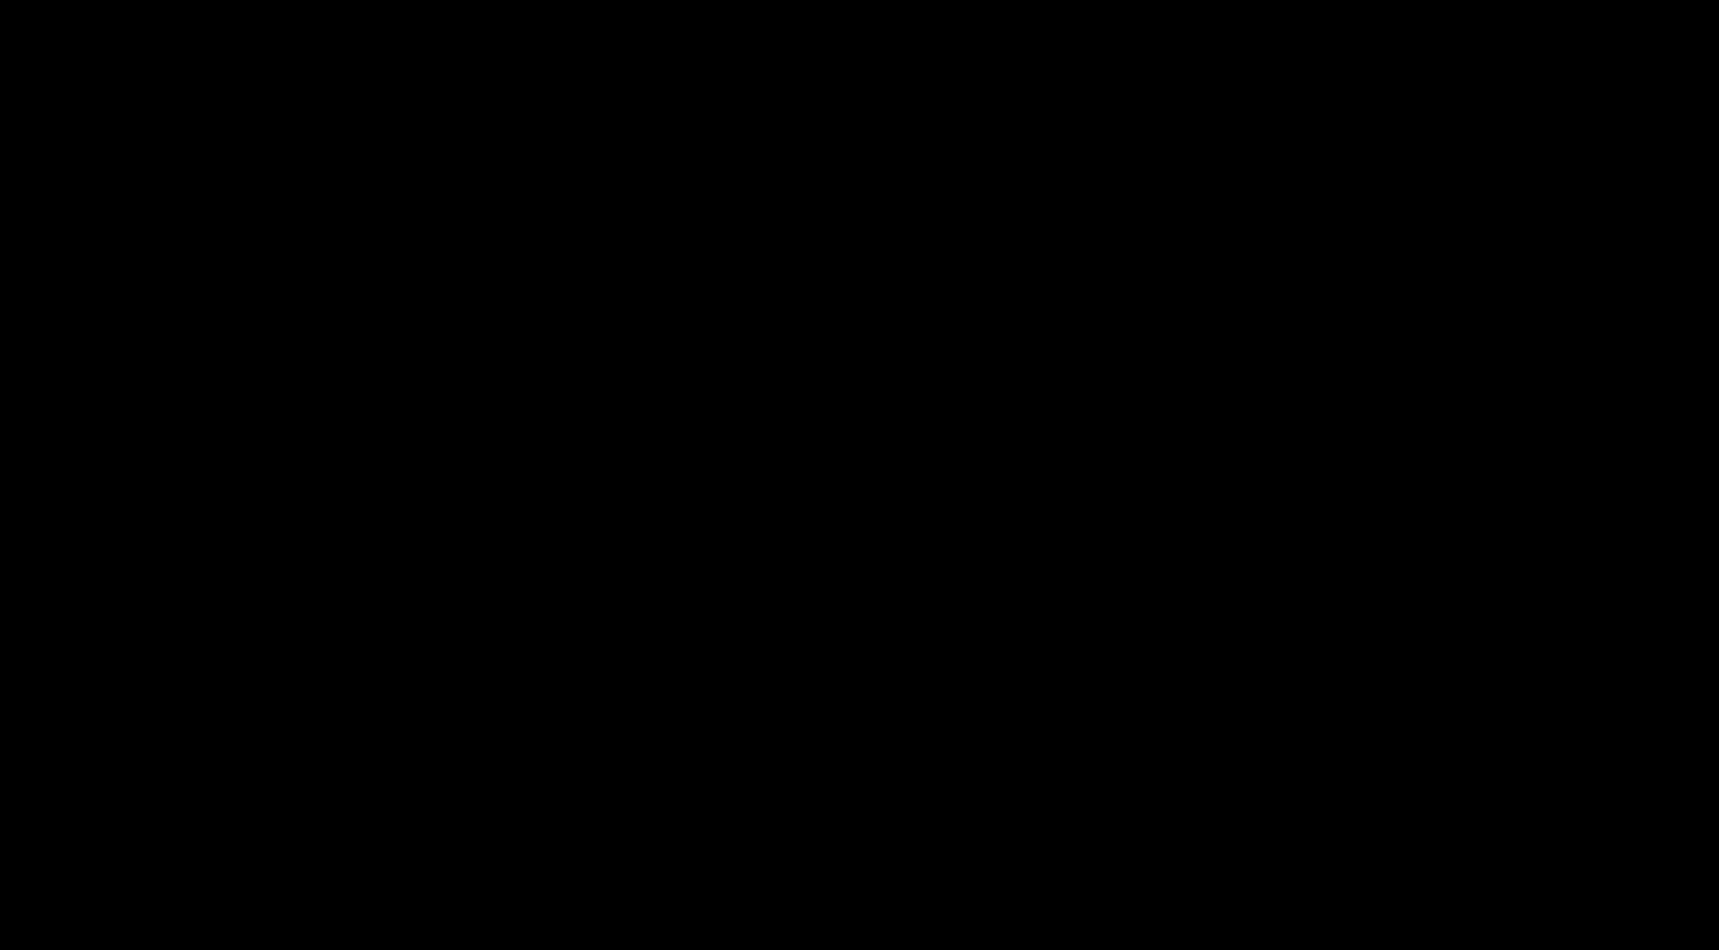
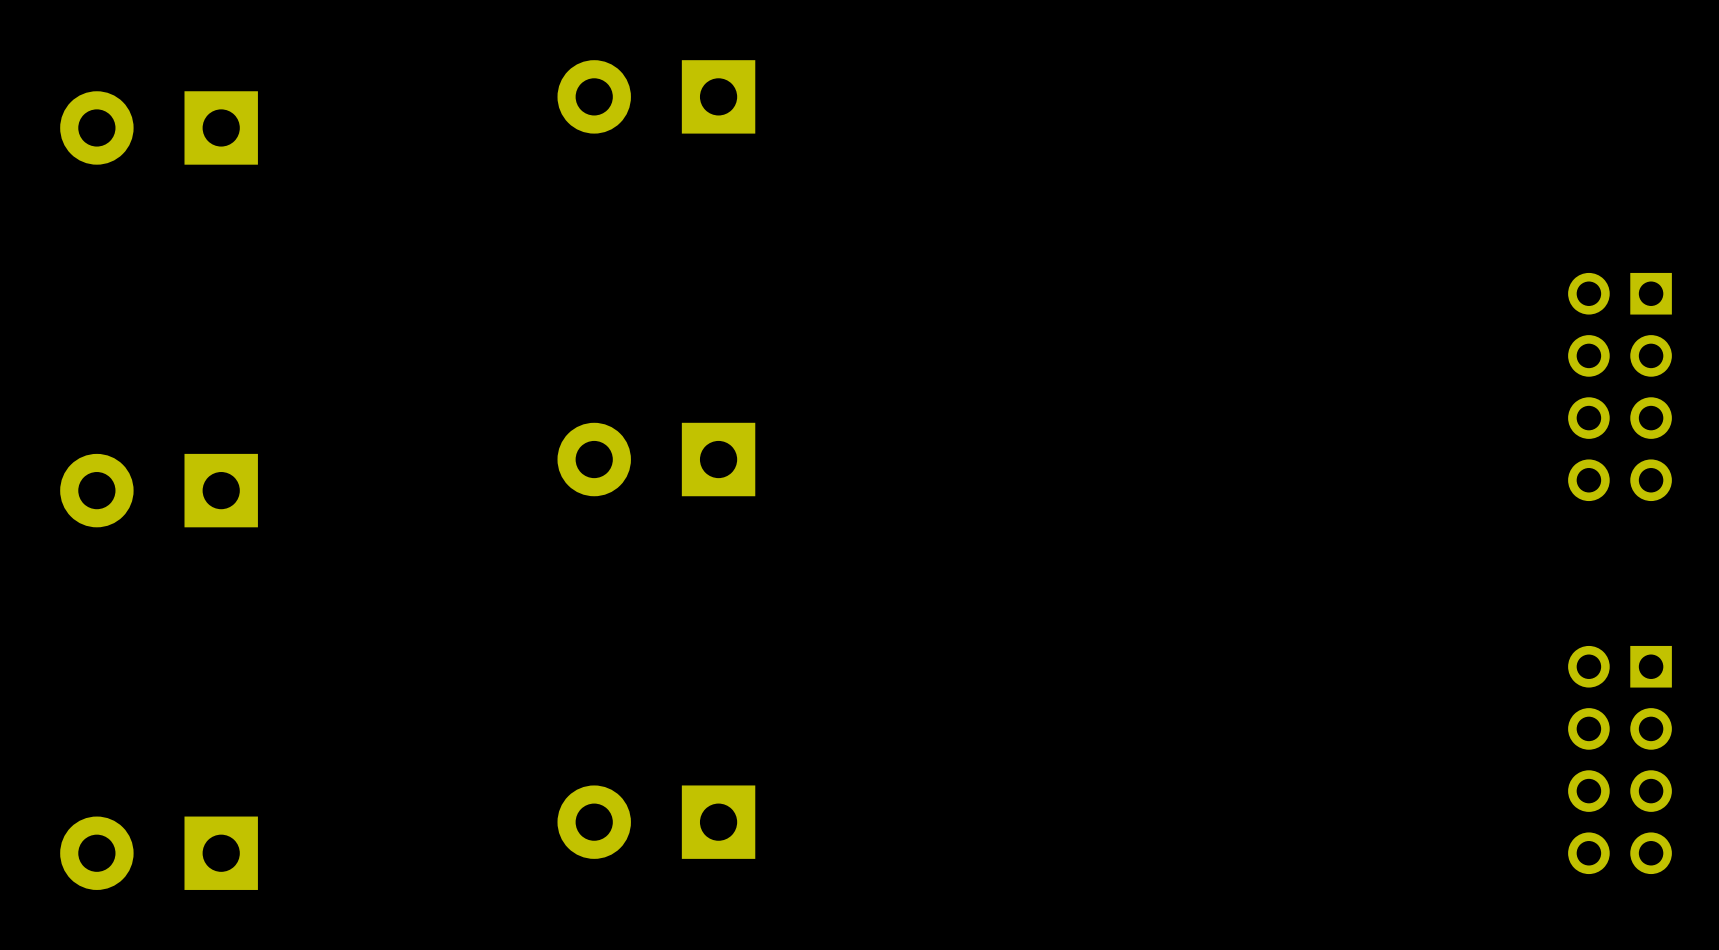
part: none -> (656, 96)
part: none -> (159, 127)
part: none -> (1619, 386)
part: none -> (656, 459)
part: none -> (159, 490)
part: none -> (1619, 760)
part: none -> (656, 822)
part: none -> (159, 853)

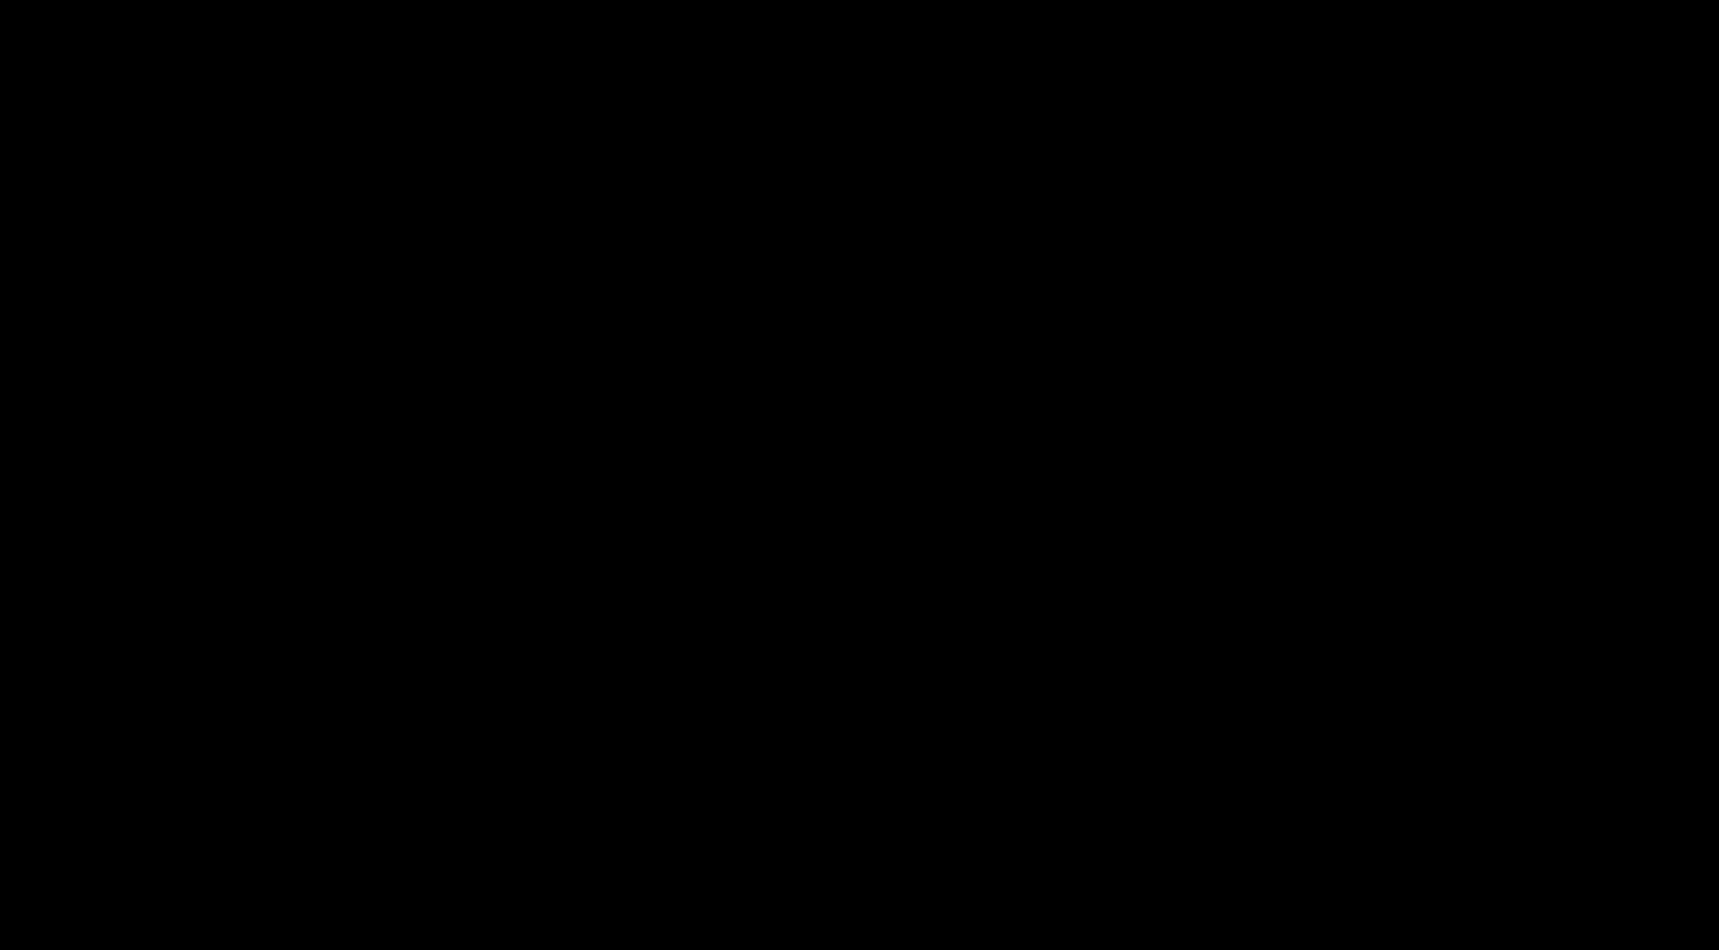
part: (656, 96) -> none
part: (159, 127) -> none
part: (1619, 386) -> none
part: (656, 459) -> none
part: (159, 490) -> none
part: (1619, 760) -> none
part: (656, 822) -> none
part: (159, 853) -> none

